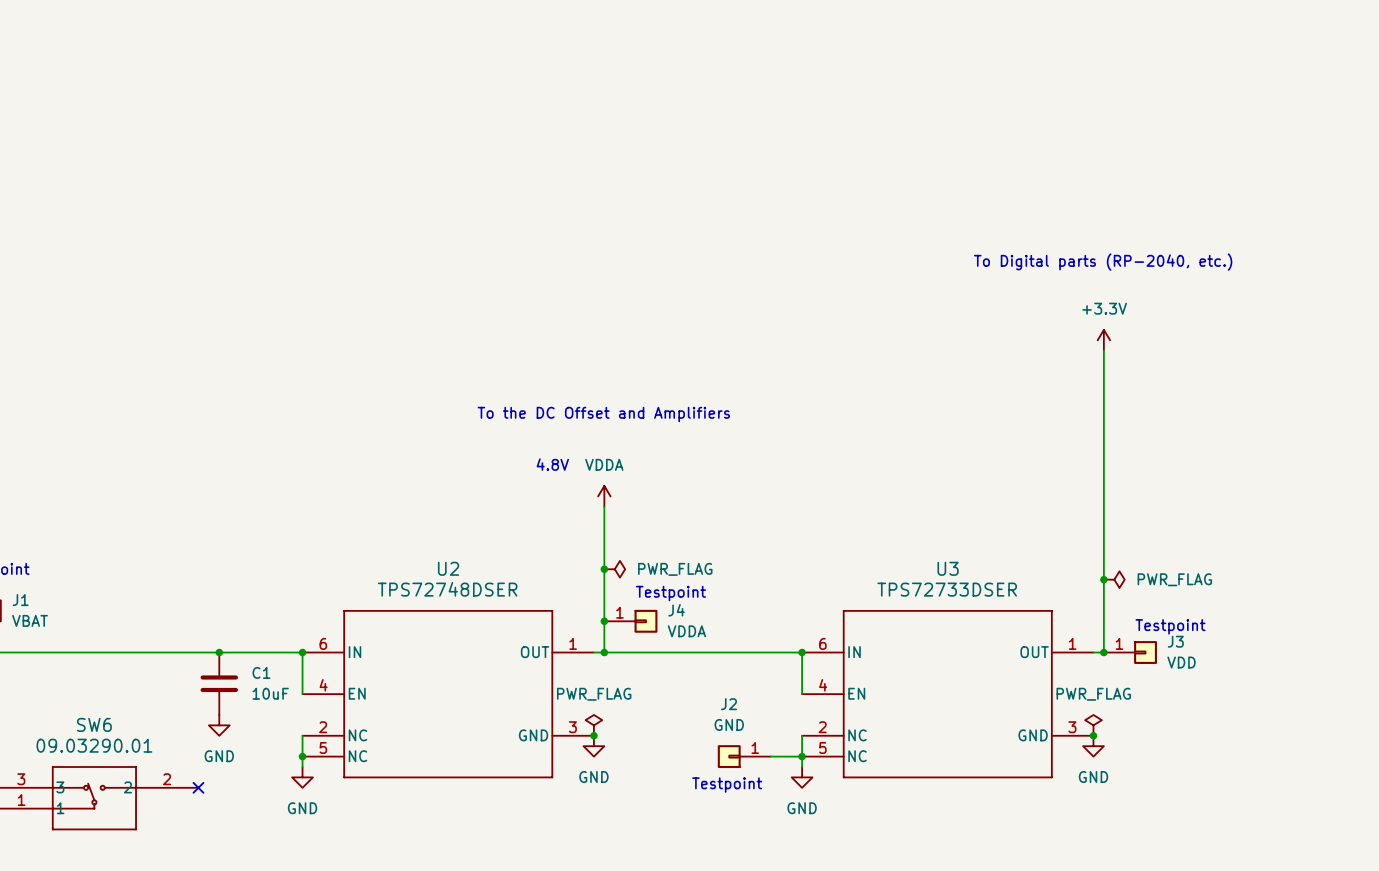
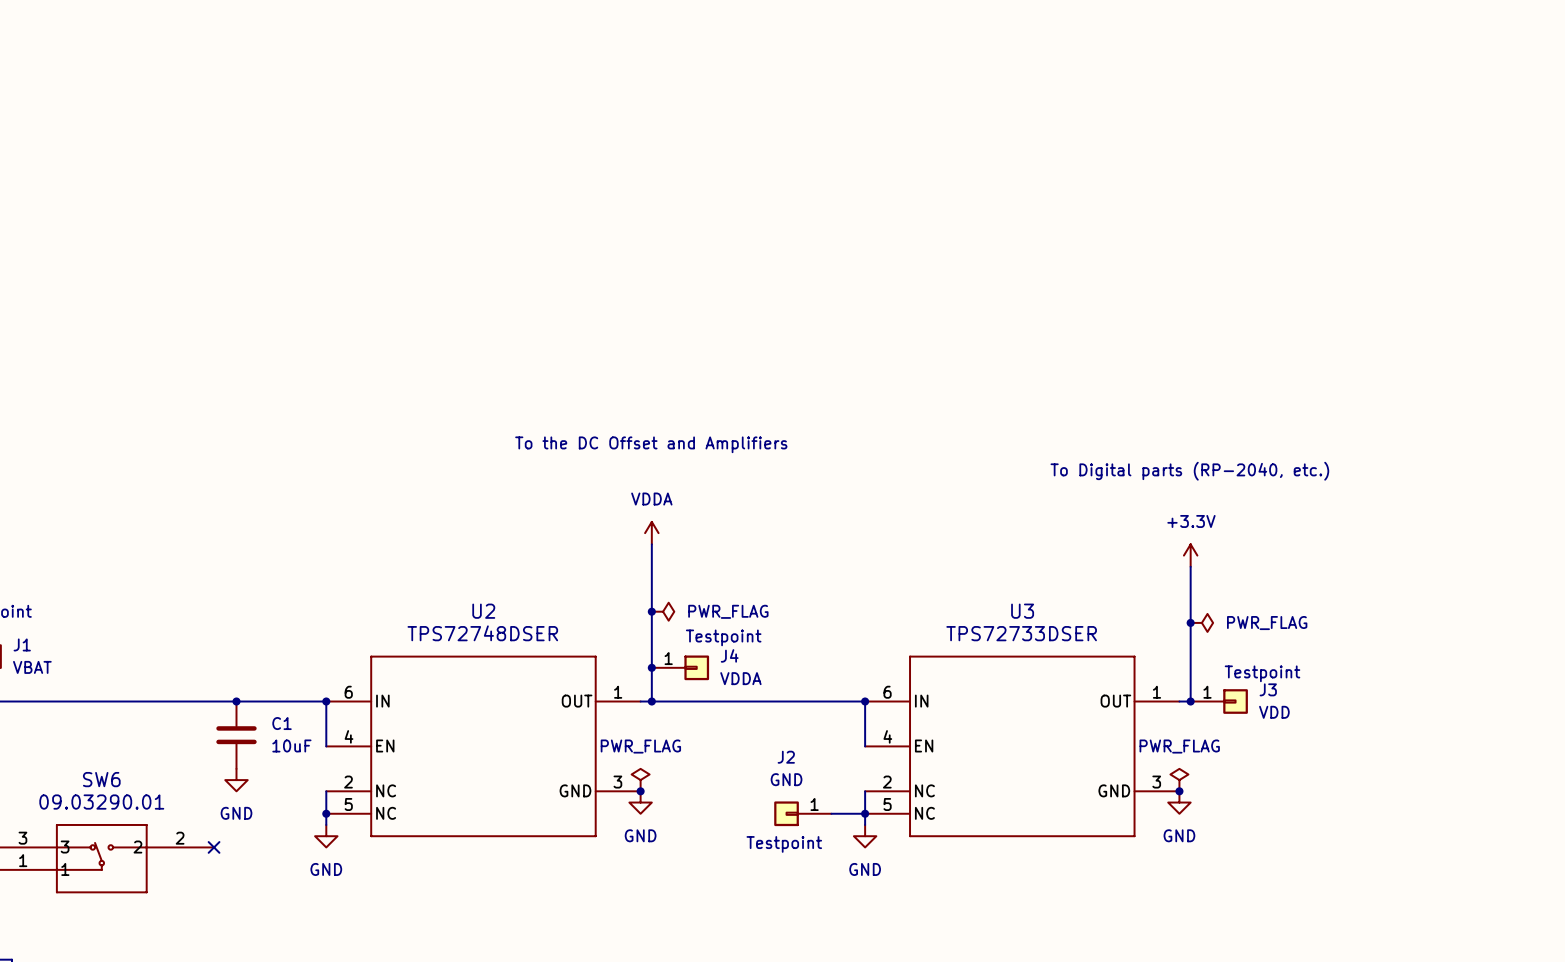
text position: To Digital parts (RP-2040, etc.) (1103, 262) -> To Digital parts (RP-2040, etc.) (1189, 471)
power symbol position: +3.3V (1103, 340) -> +3.3V (1190, 555)
wire: (1103, 350) (1103, 527) -> none
text: 4.8V (552, 464) -> none

